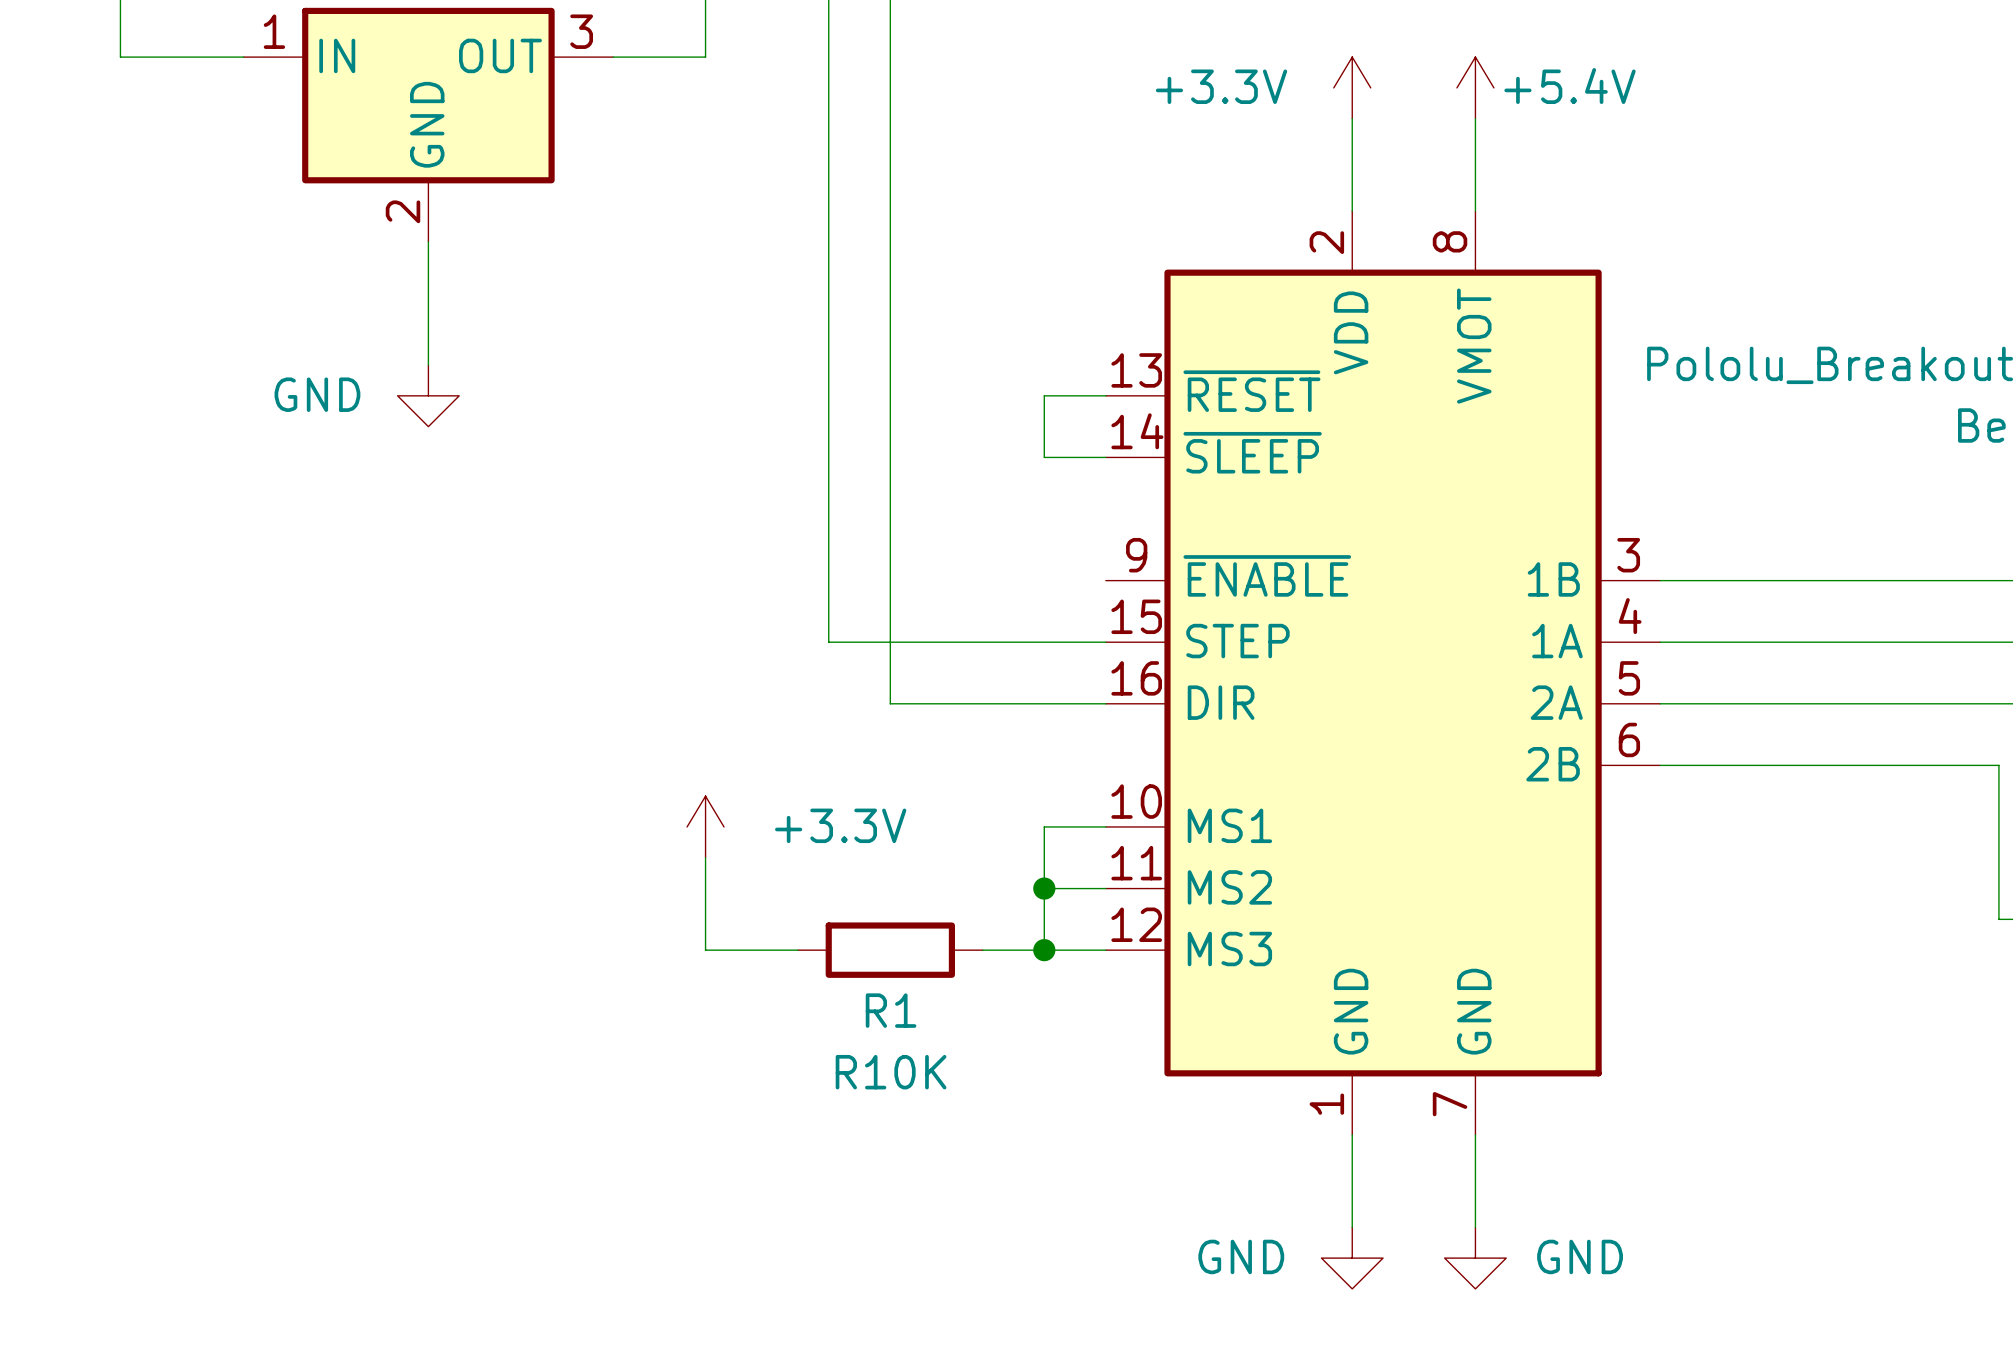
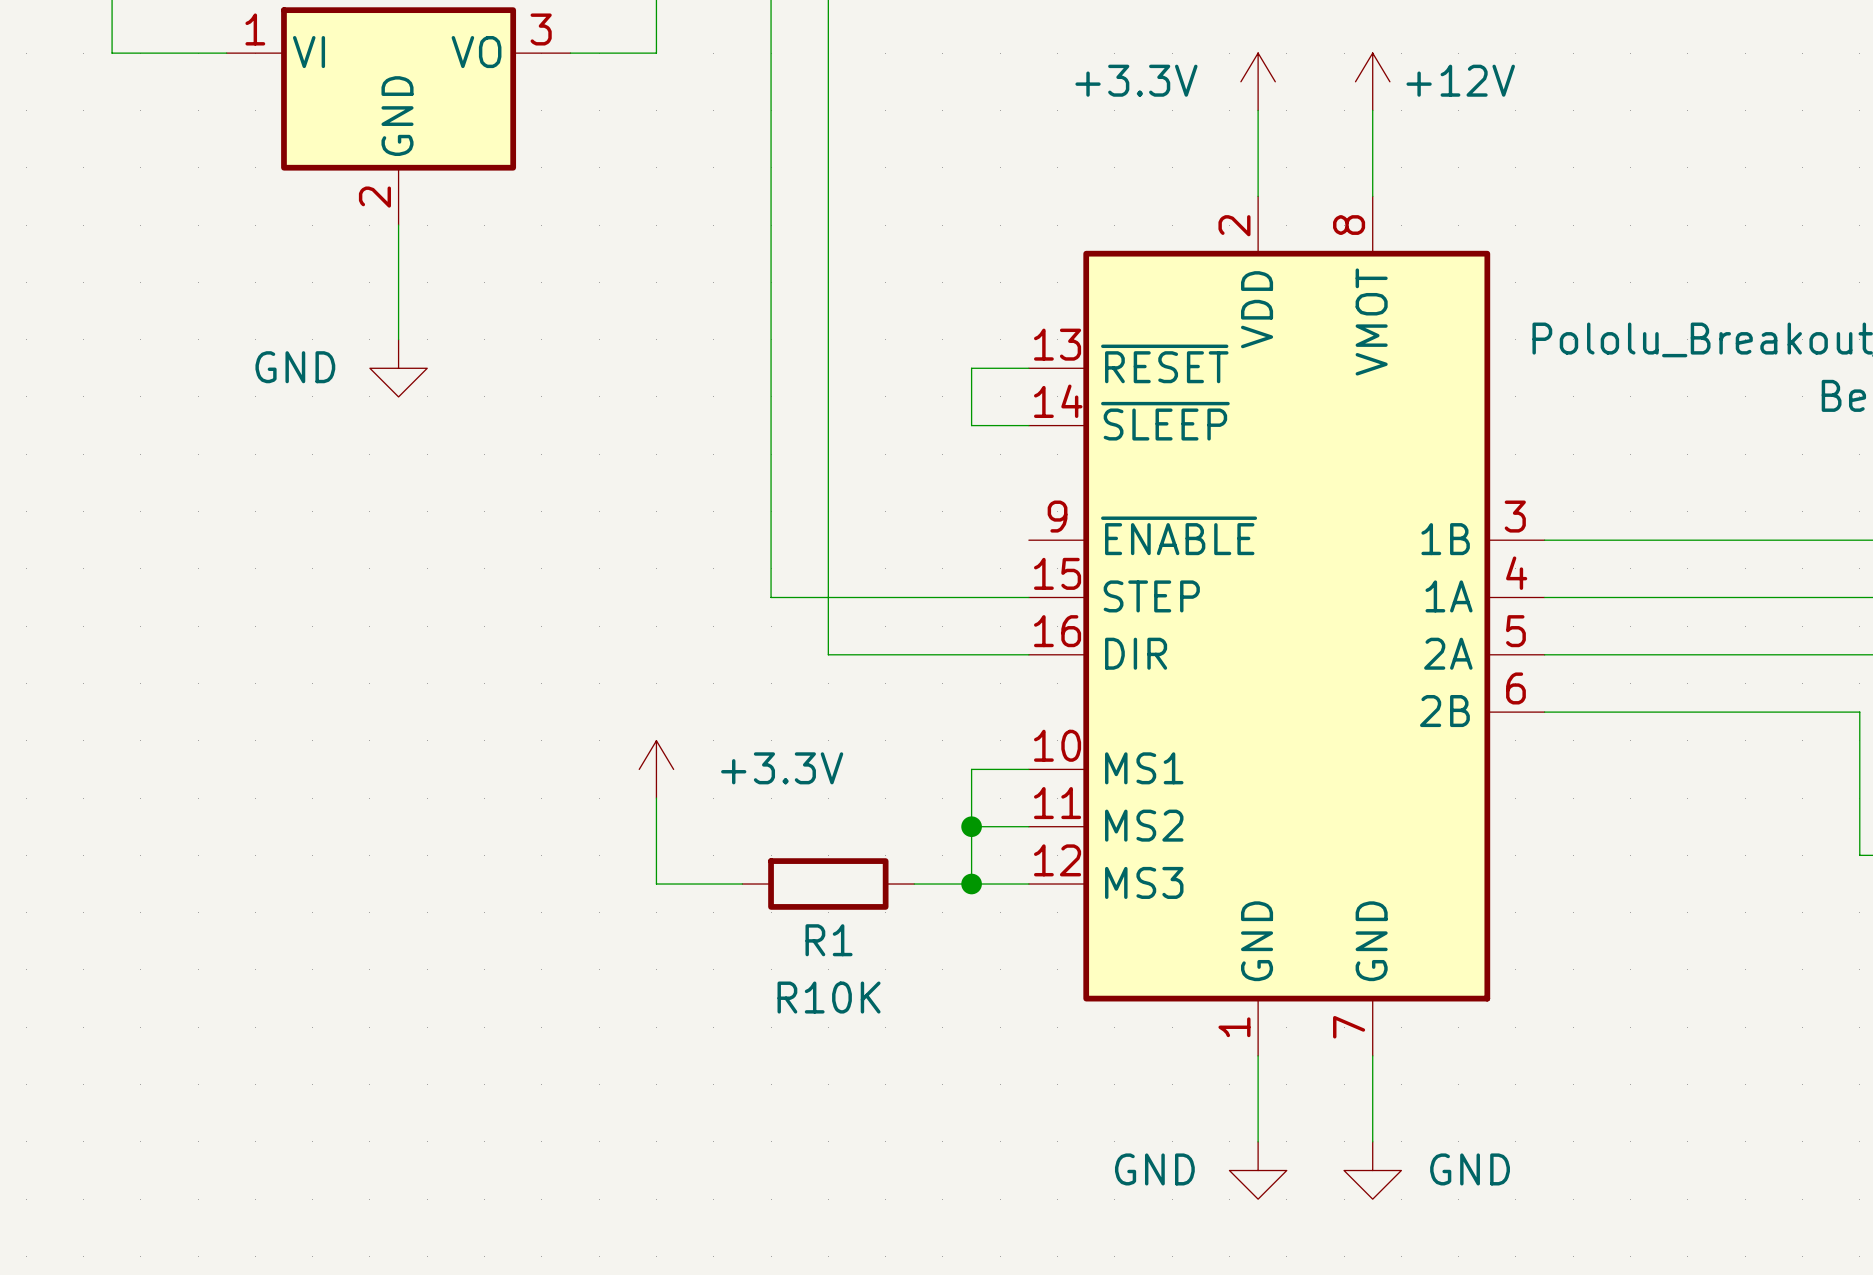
part pin name: IN (337, 55) -> VI (309, 52)
part pin name: OUT (500, 55) -> VO (476, 52)
power symbol: +5.4V (1475, 87) -> +12V (1372, 81)

